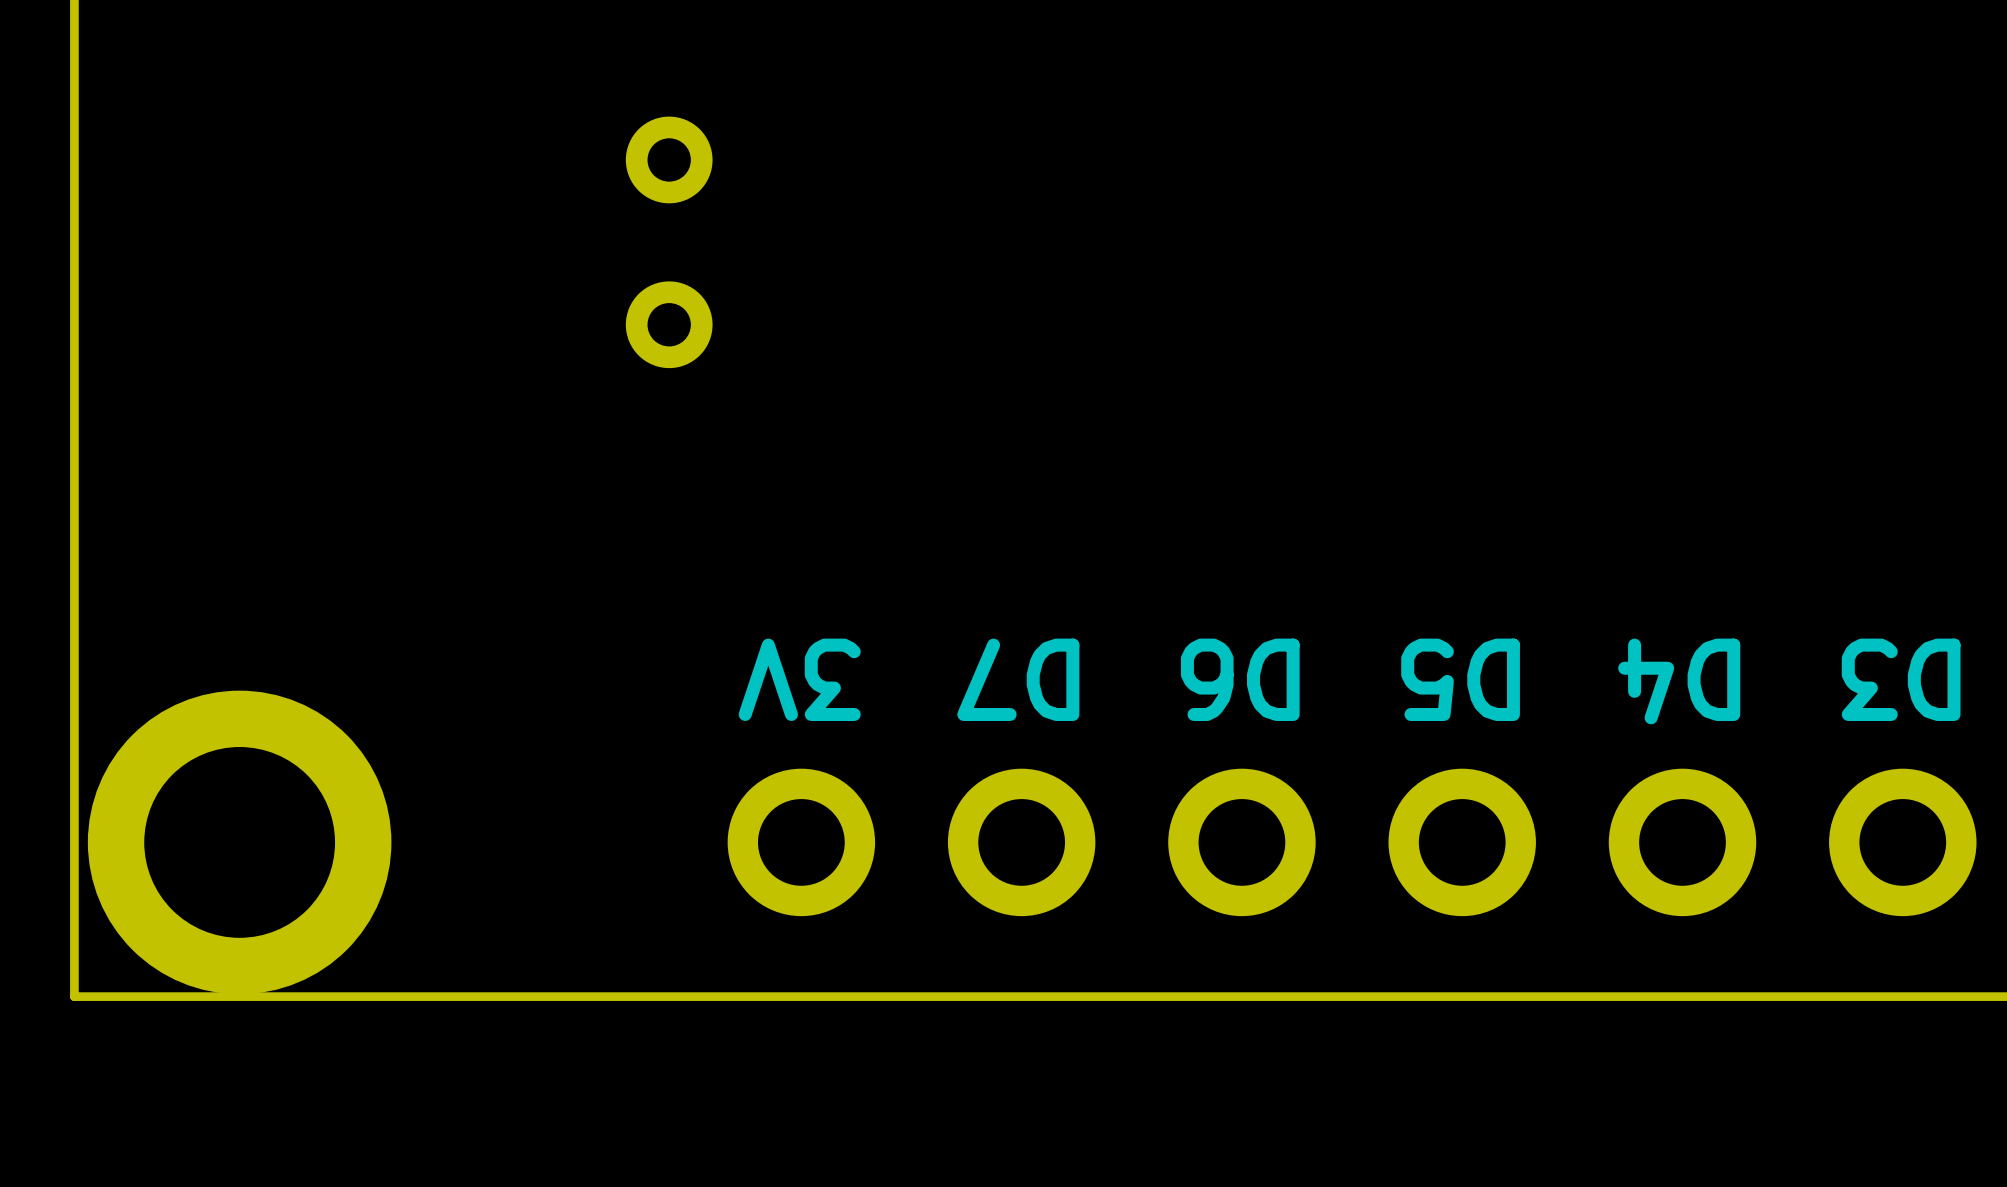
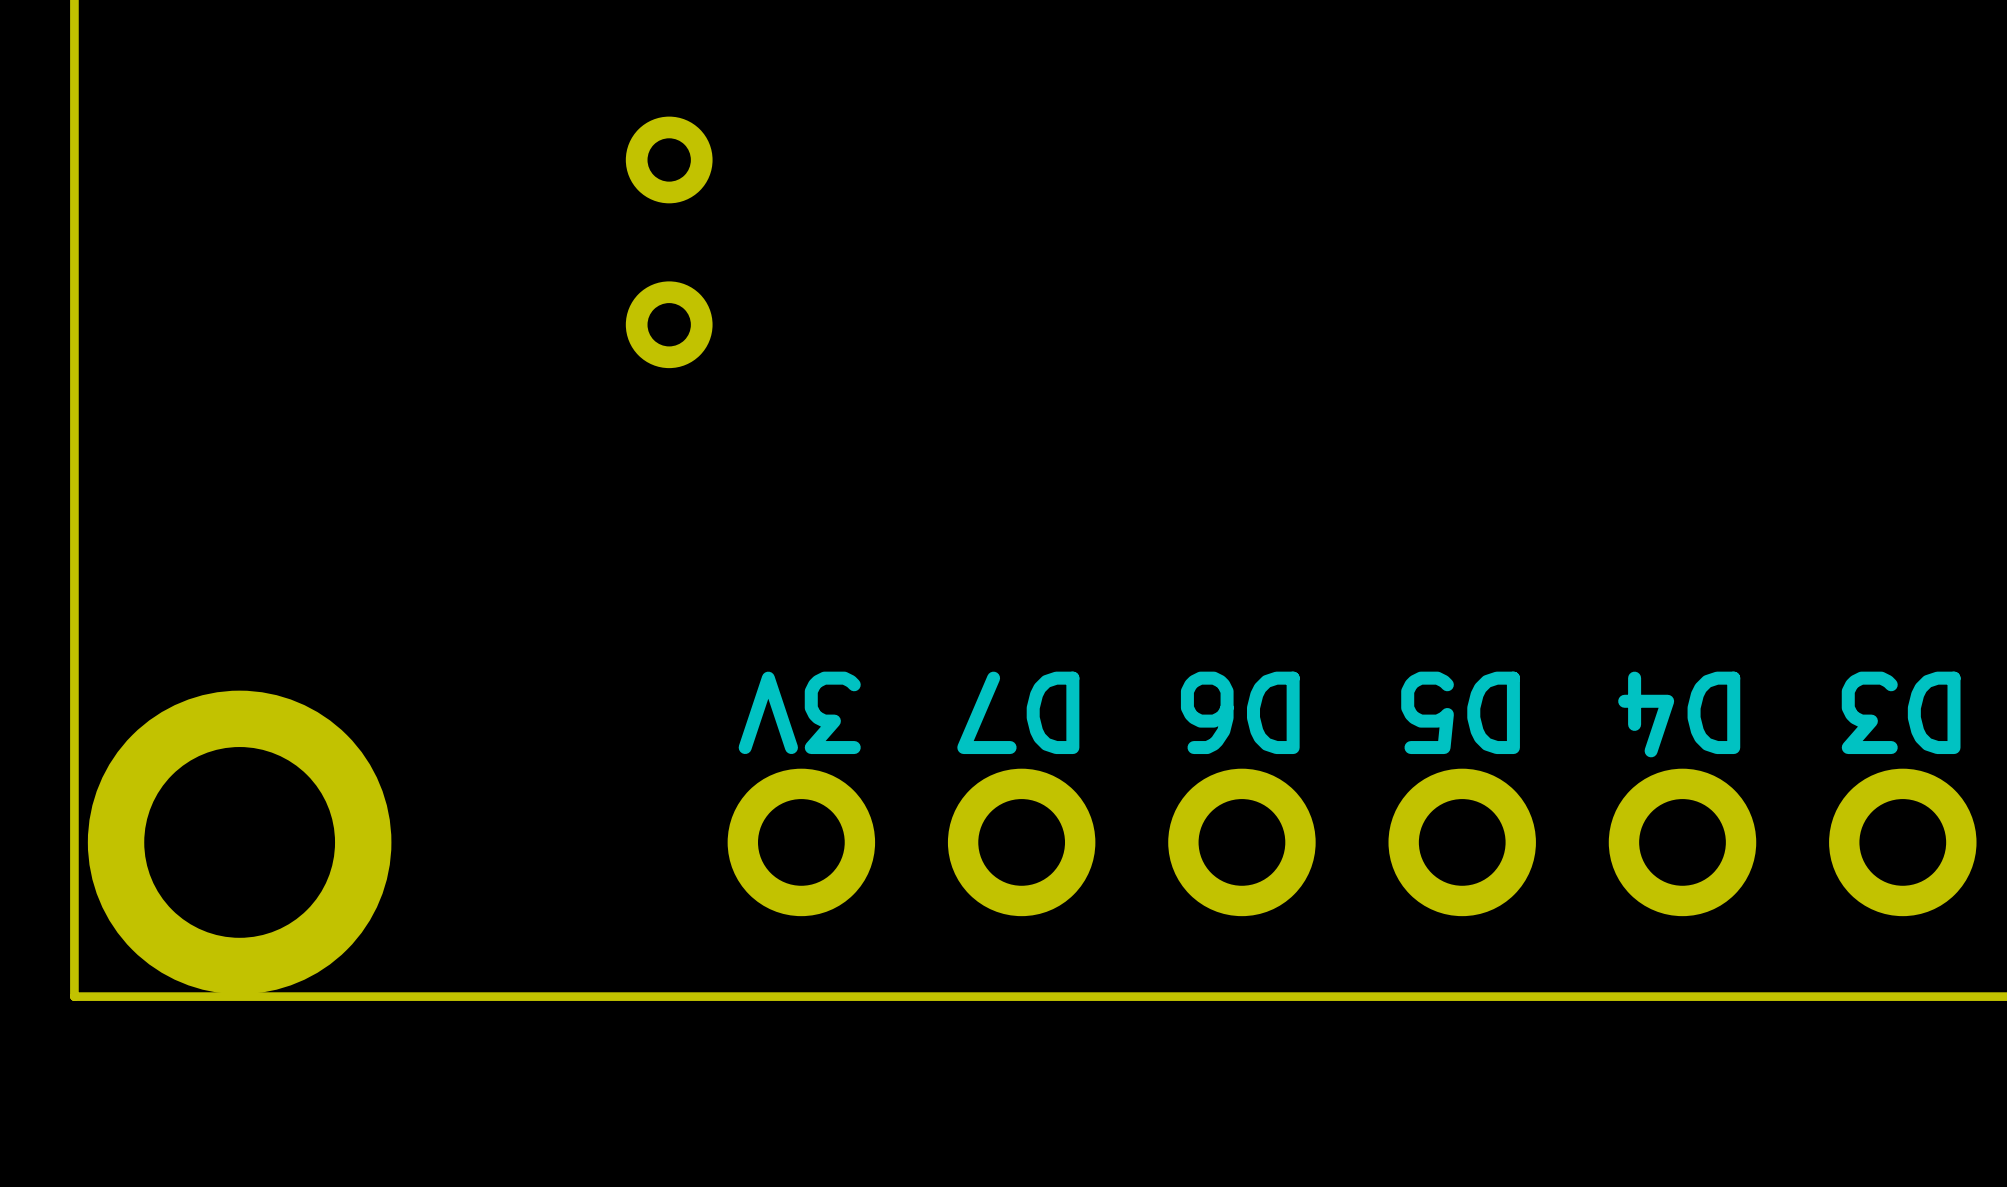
text position: 3V (799, 679) -> 3V (799, 712)
text position: D7 (1018, 679) -> D7 (1018, 712)
text position: D6 (1240, 679) -> D6 (1240, 712)
text position: D5 (1460, 679) -> D5 (1460, 712)
text position: D3 (1901, 679) -> D3 (1901, 712)
text position: D4 (1679, 681) -> D4 (1679, 714)

